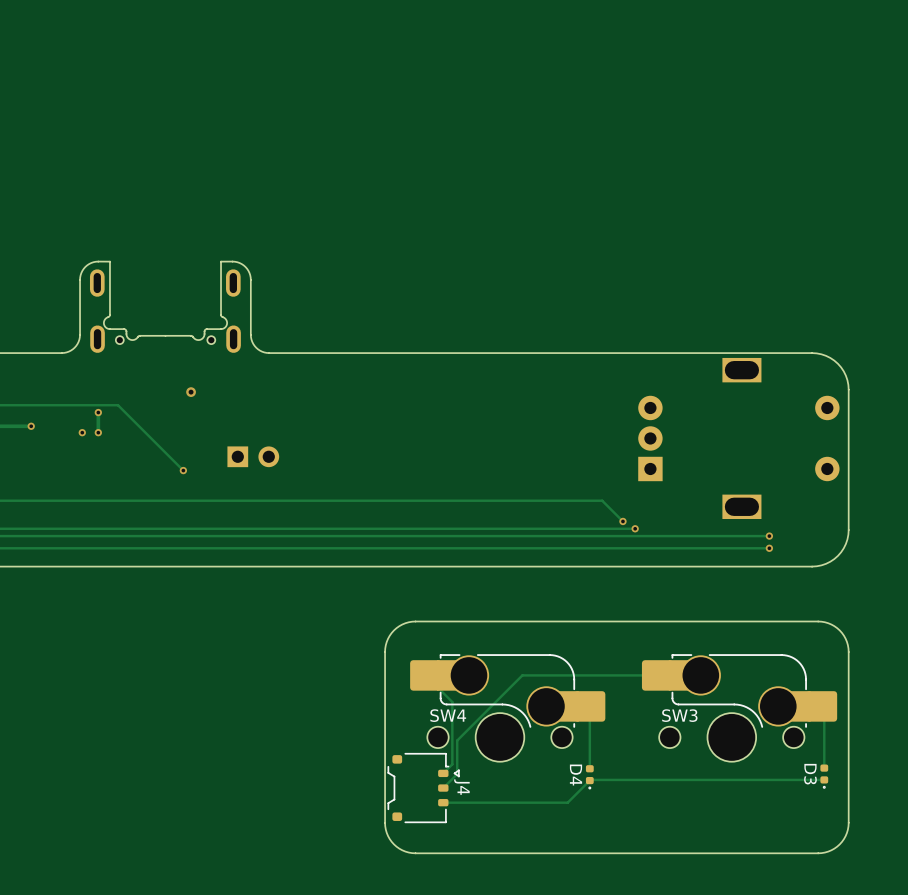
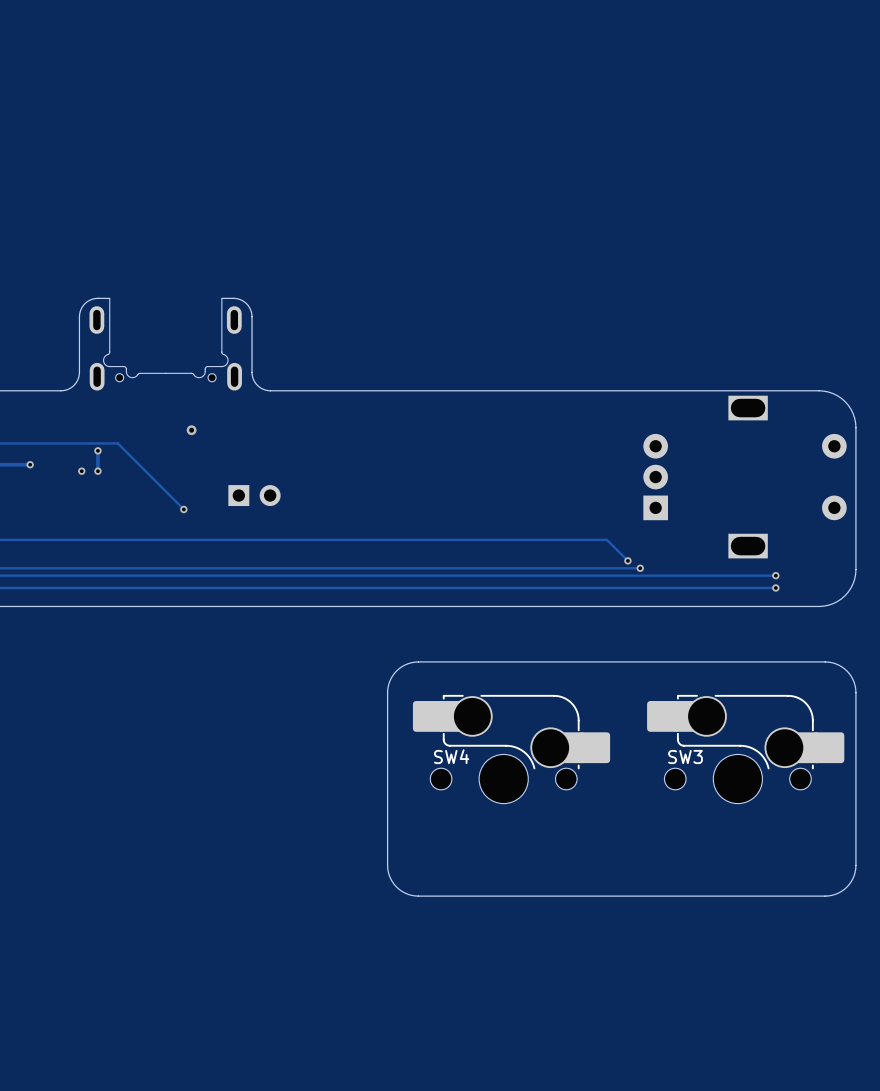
track: (425, 675) (452, 702) (452, 764) (443, 773) -> none
track: (657, 675) (522, 675) (457, 740) (457, 774) (443, 788) -> none
track: (589, 706) (589, 768) -> none
track: (821, 706) (824, 709) (824, 768) -> none
D3: (824, 776) -> none
D4: (589, 777) -> none
track: (824, 779) (592, 779) -> none
track: (589, 780) (567, 802) (443, 802) -> none
J4: (423, 788) -> none

